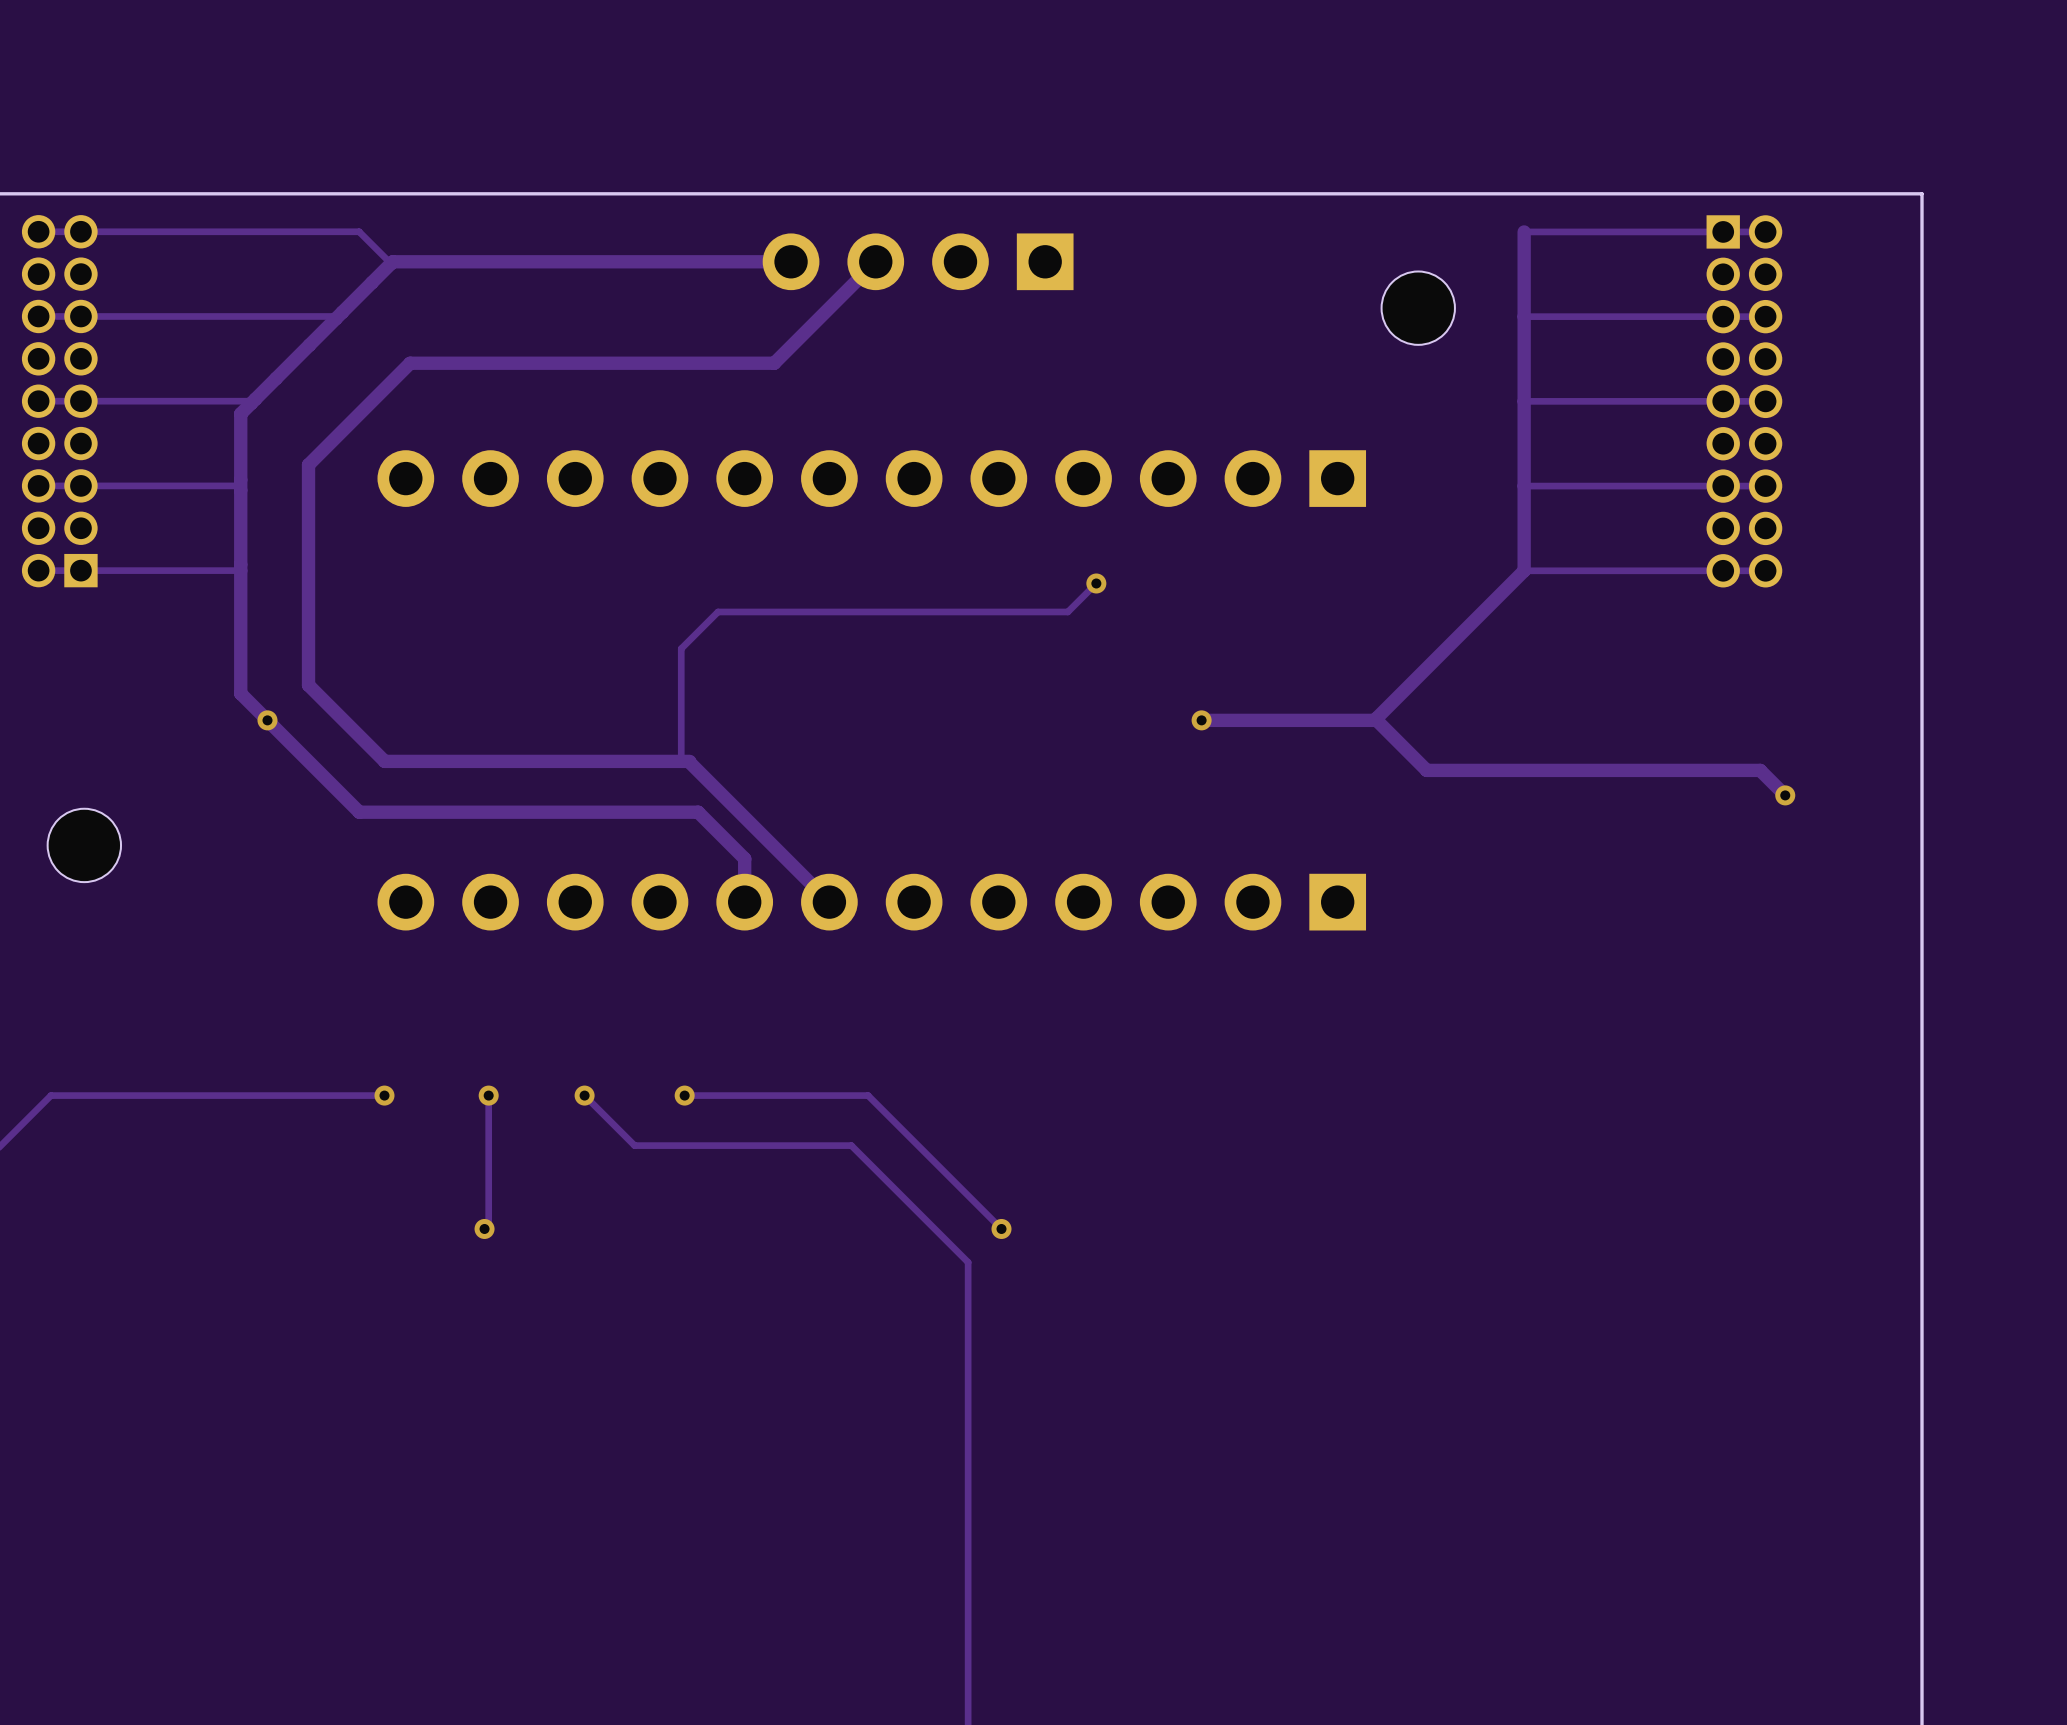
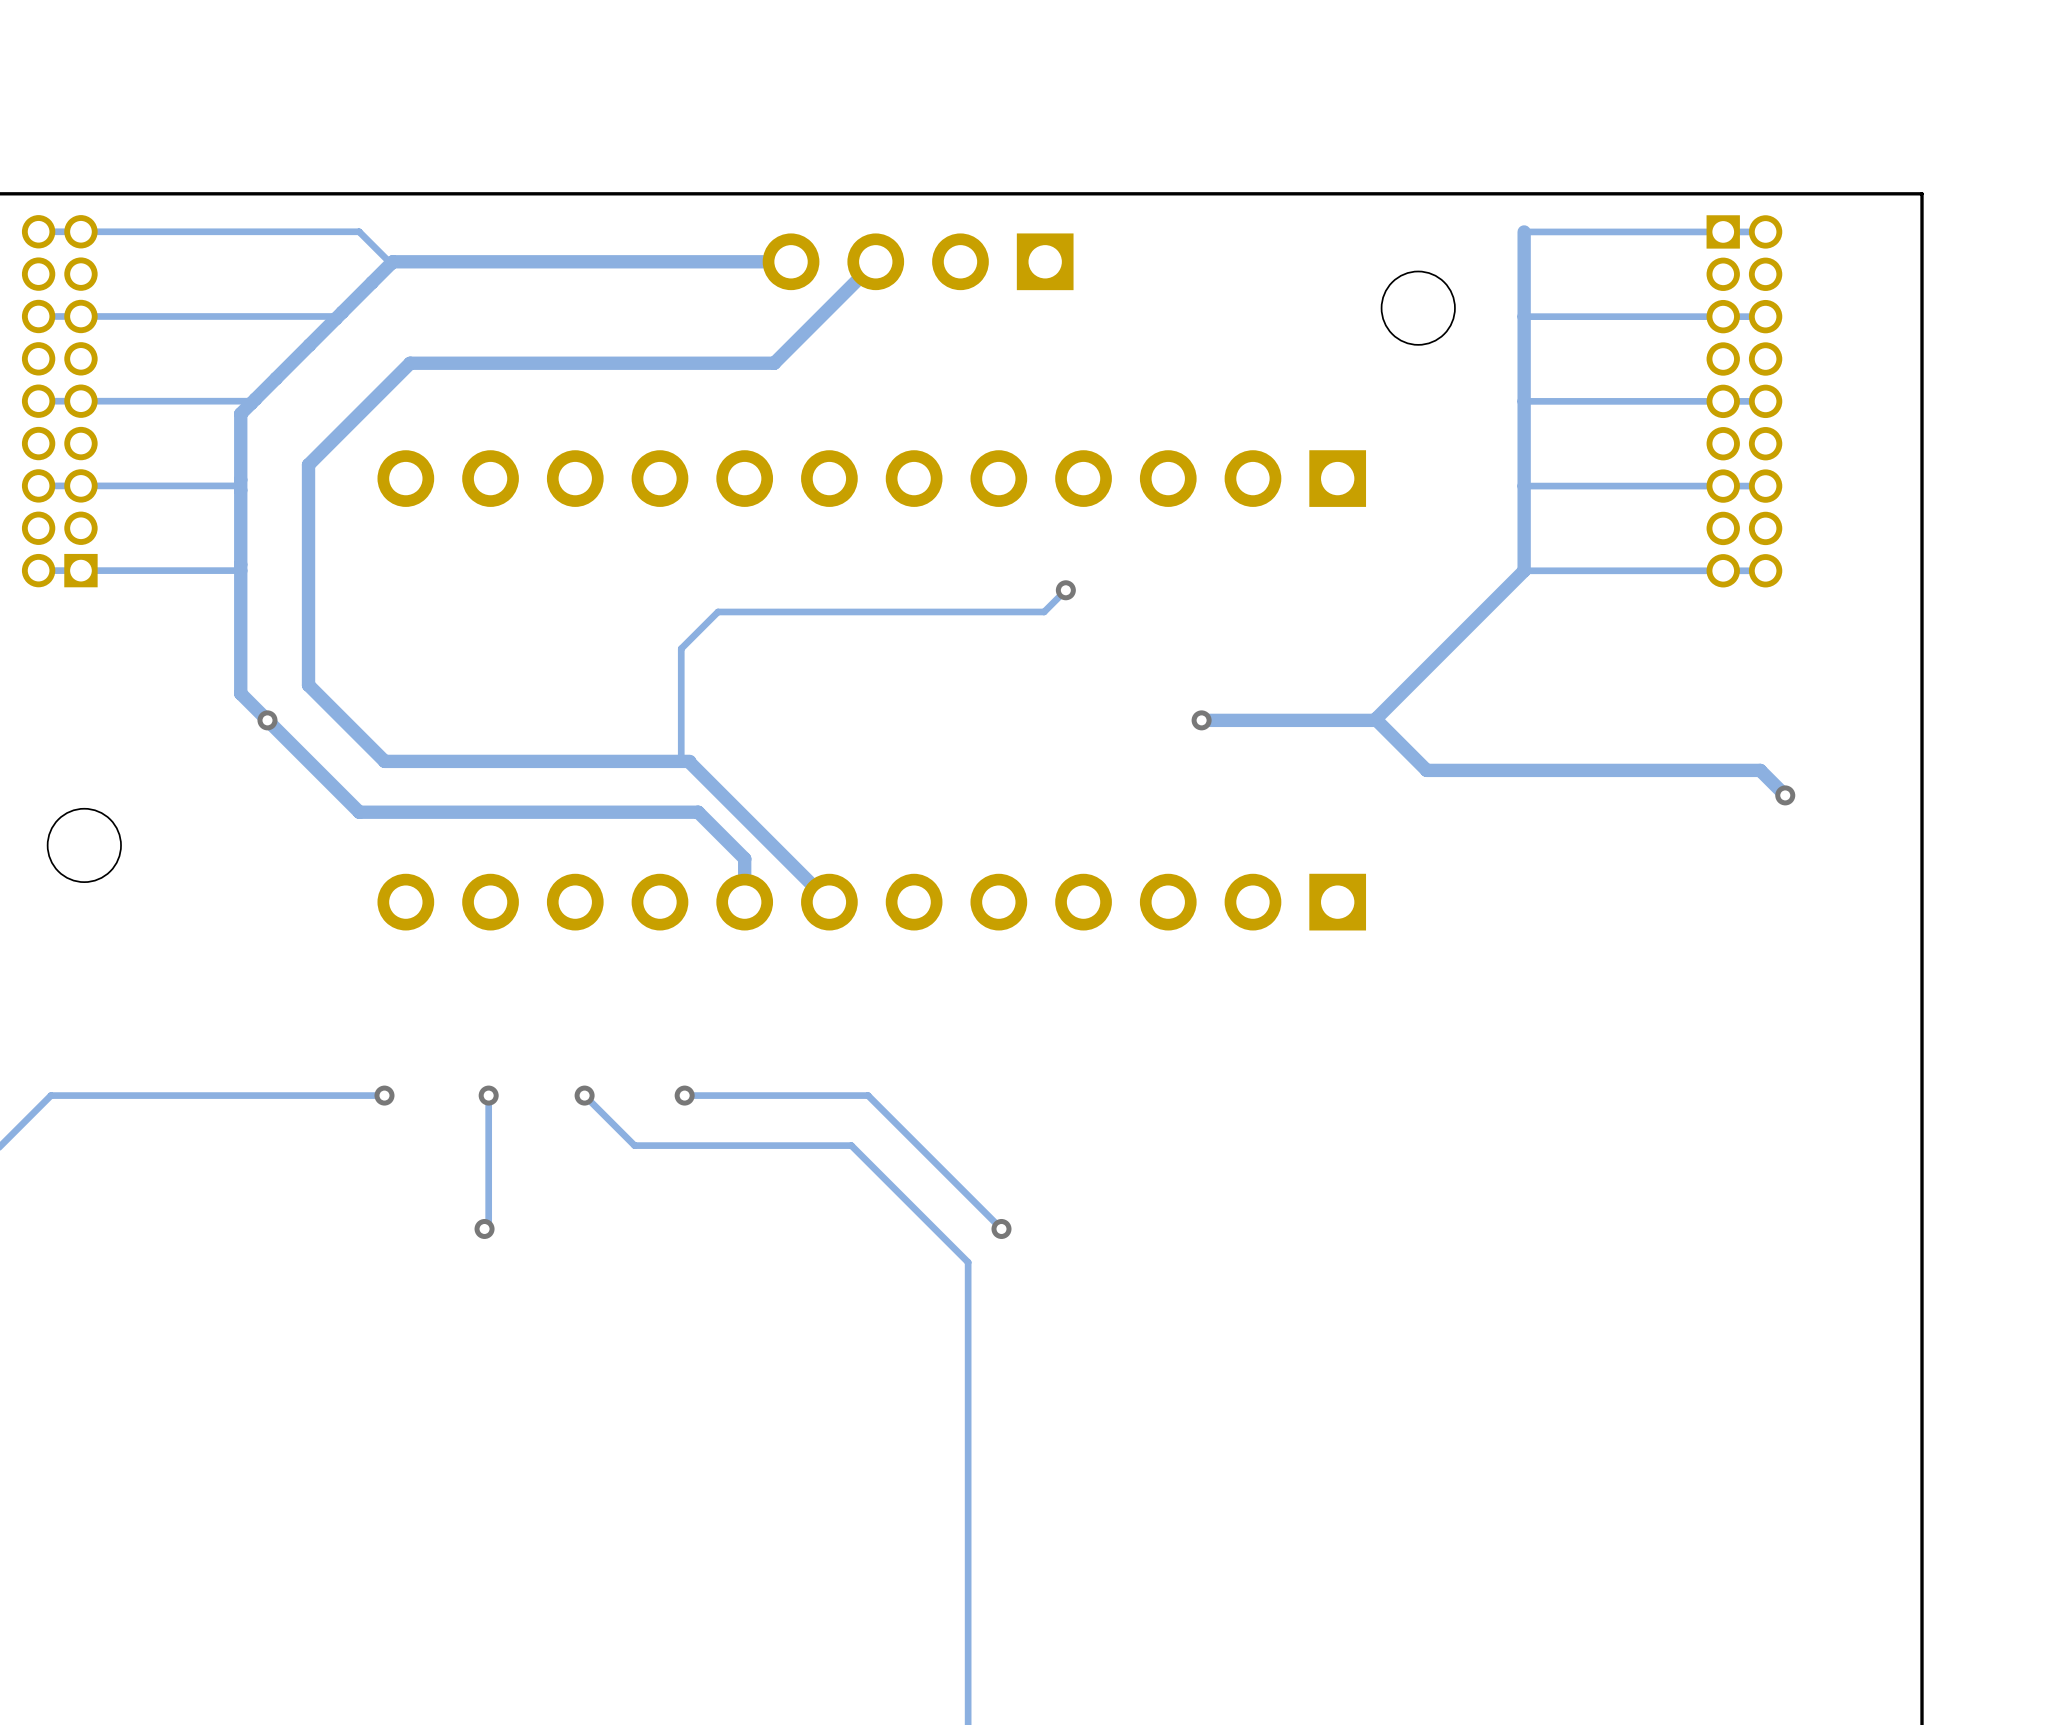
track: (1096, 583) (1067, 611) (1044, 611) -> (1065, 590) (1044, 611)
via position: (1096, 583) -> (1065, 590)

